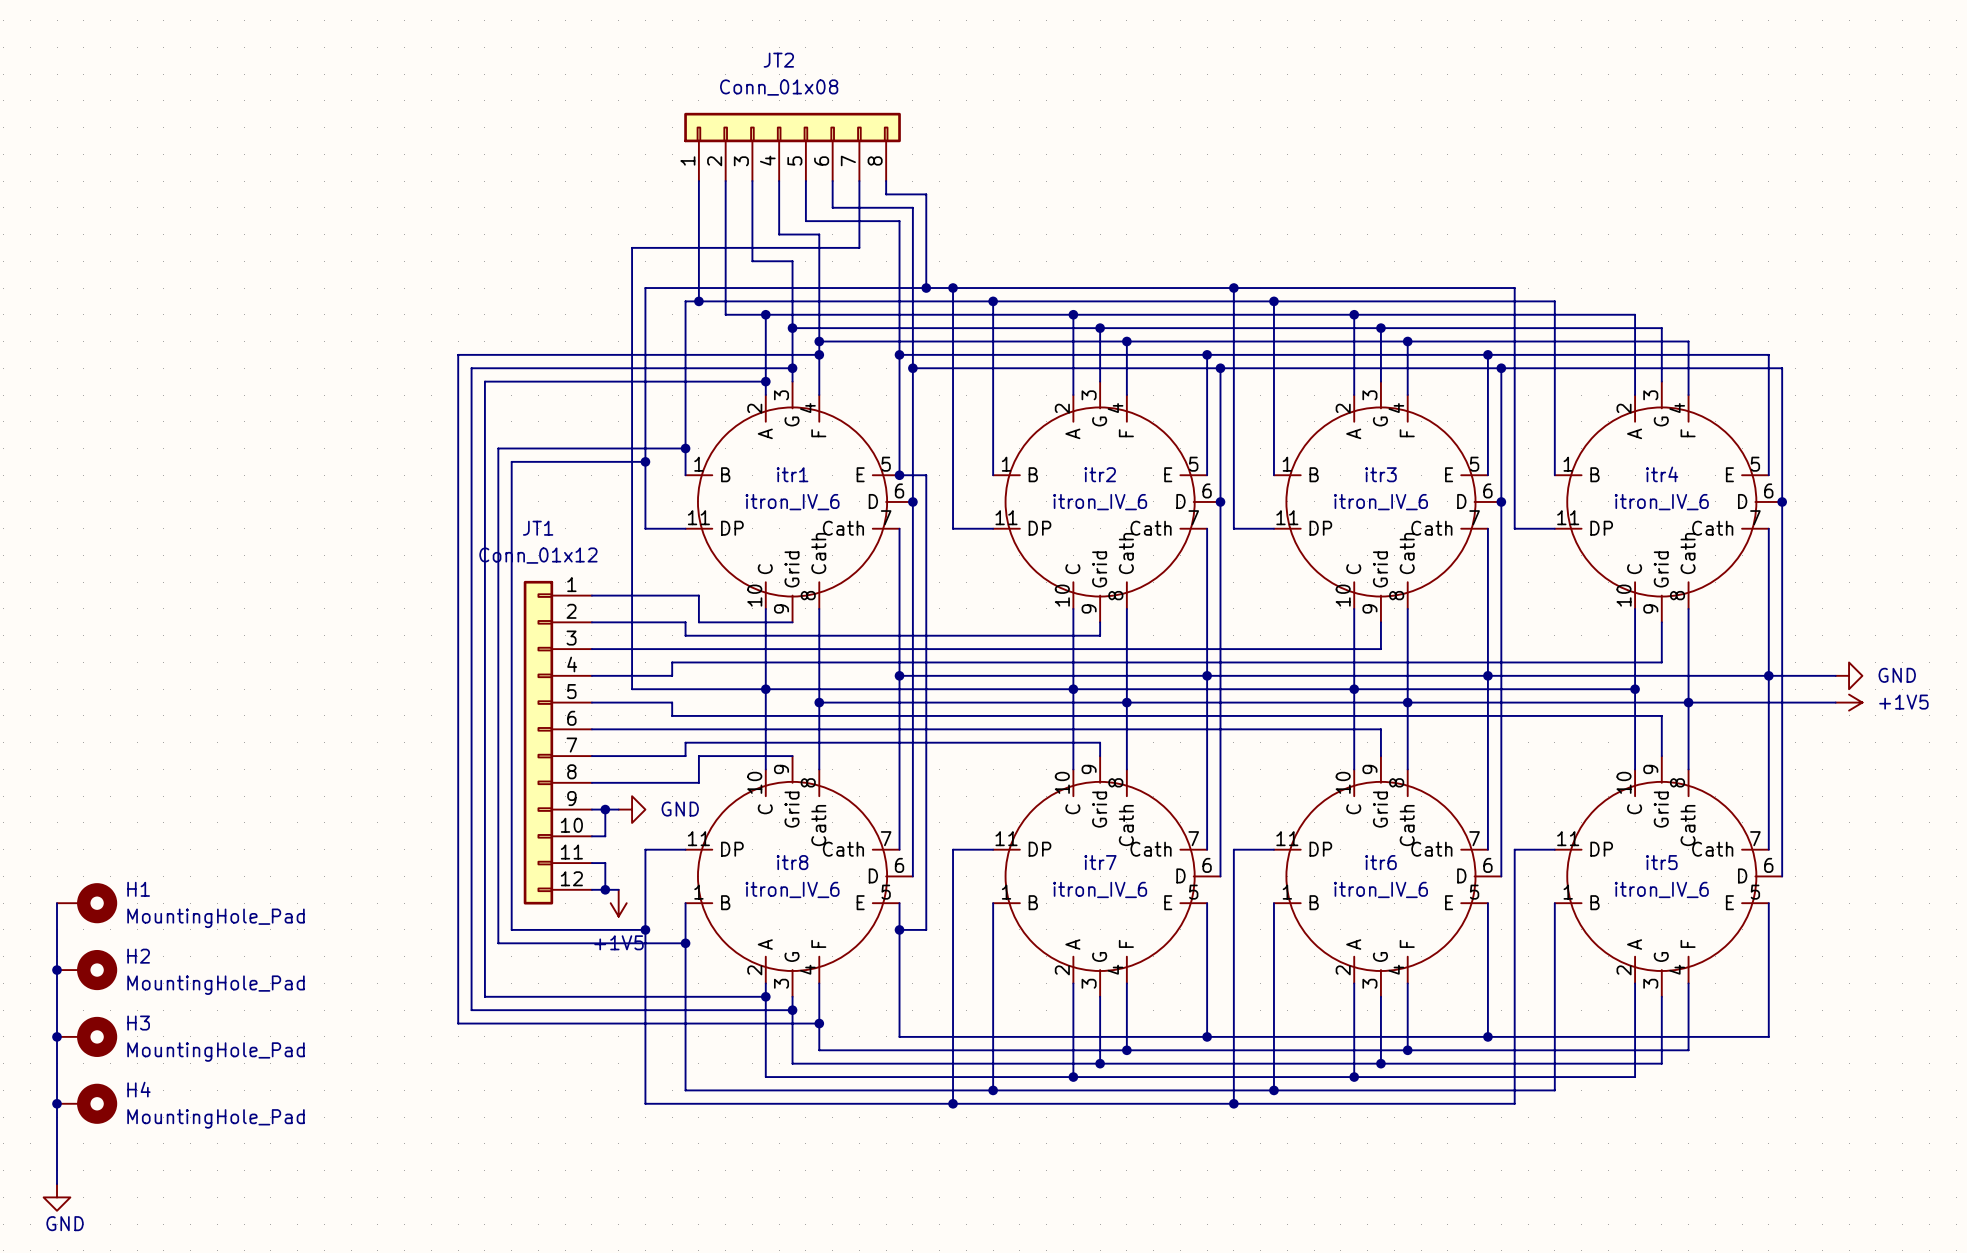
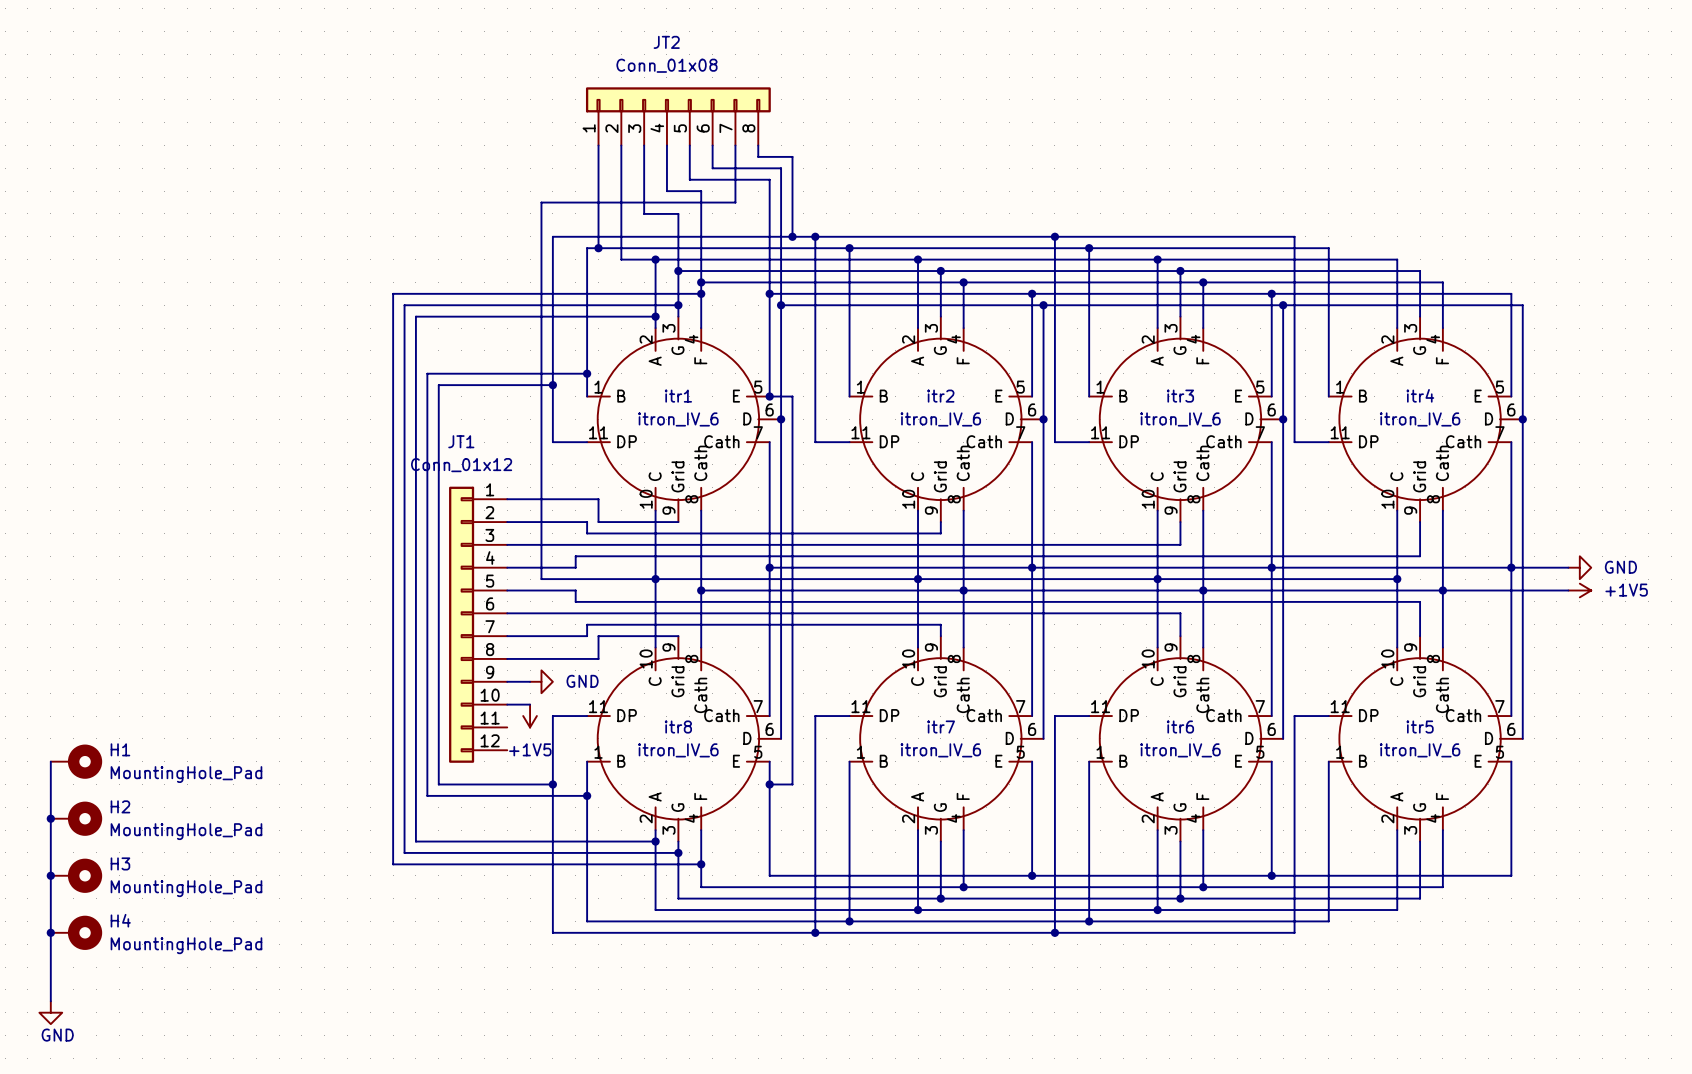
wire: (605, 809) (605, 836) -> (530, 704) (518, 704)
junction: (605, 809) -> none
wire: (591, 863) (605, 863) (605, 889) -> none
wire: (591, 889) (618, 889) -> none
junction: (605, 889) -> none
power symbol position: +1V5 (618, 903) -> +1V5 (530, 716)

